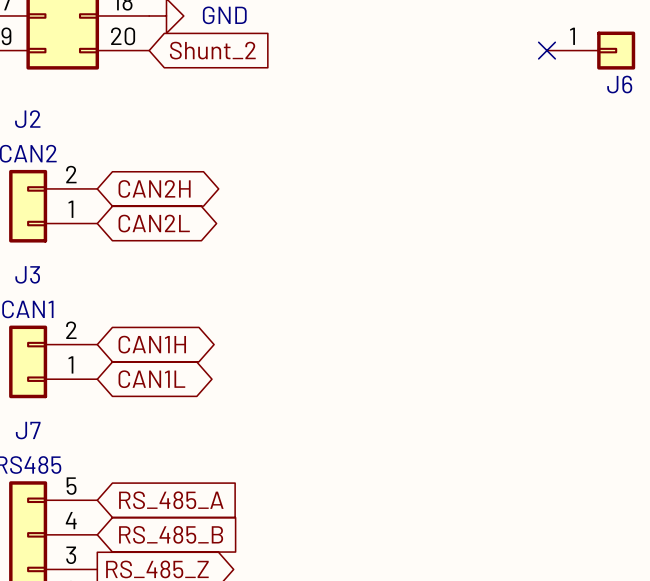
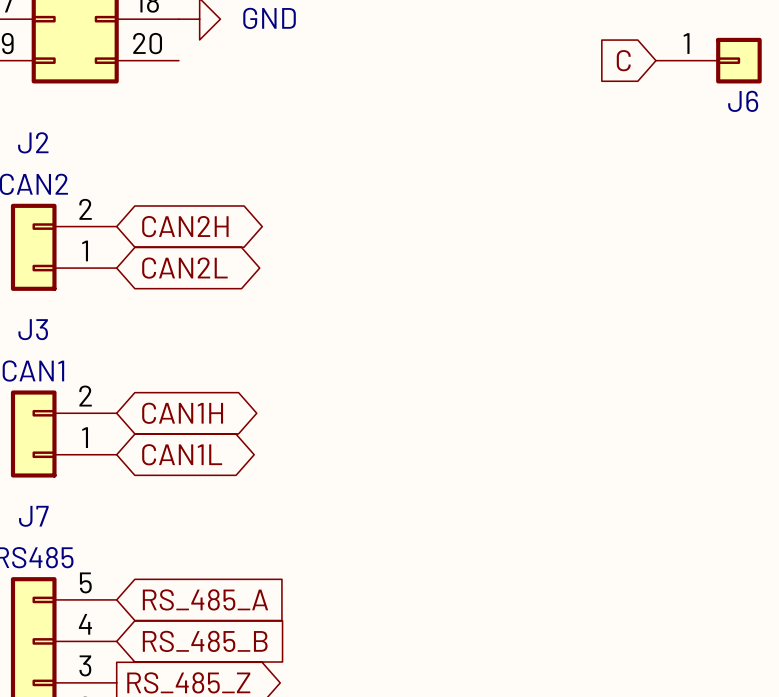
global label: Shunt_2 (212, 50) -> none
global label: none -> C (623, 60)
no-connect mark: (546, 50) -> none

